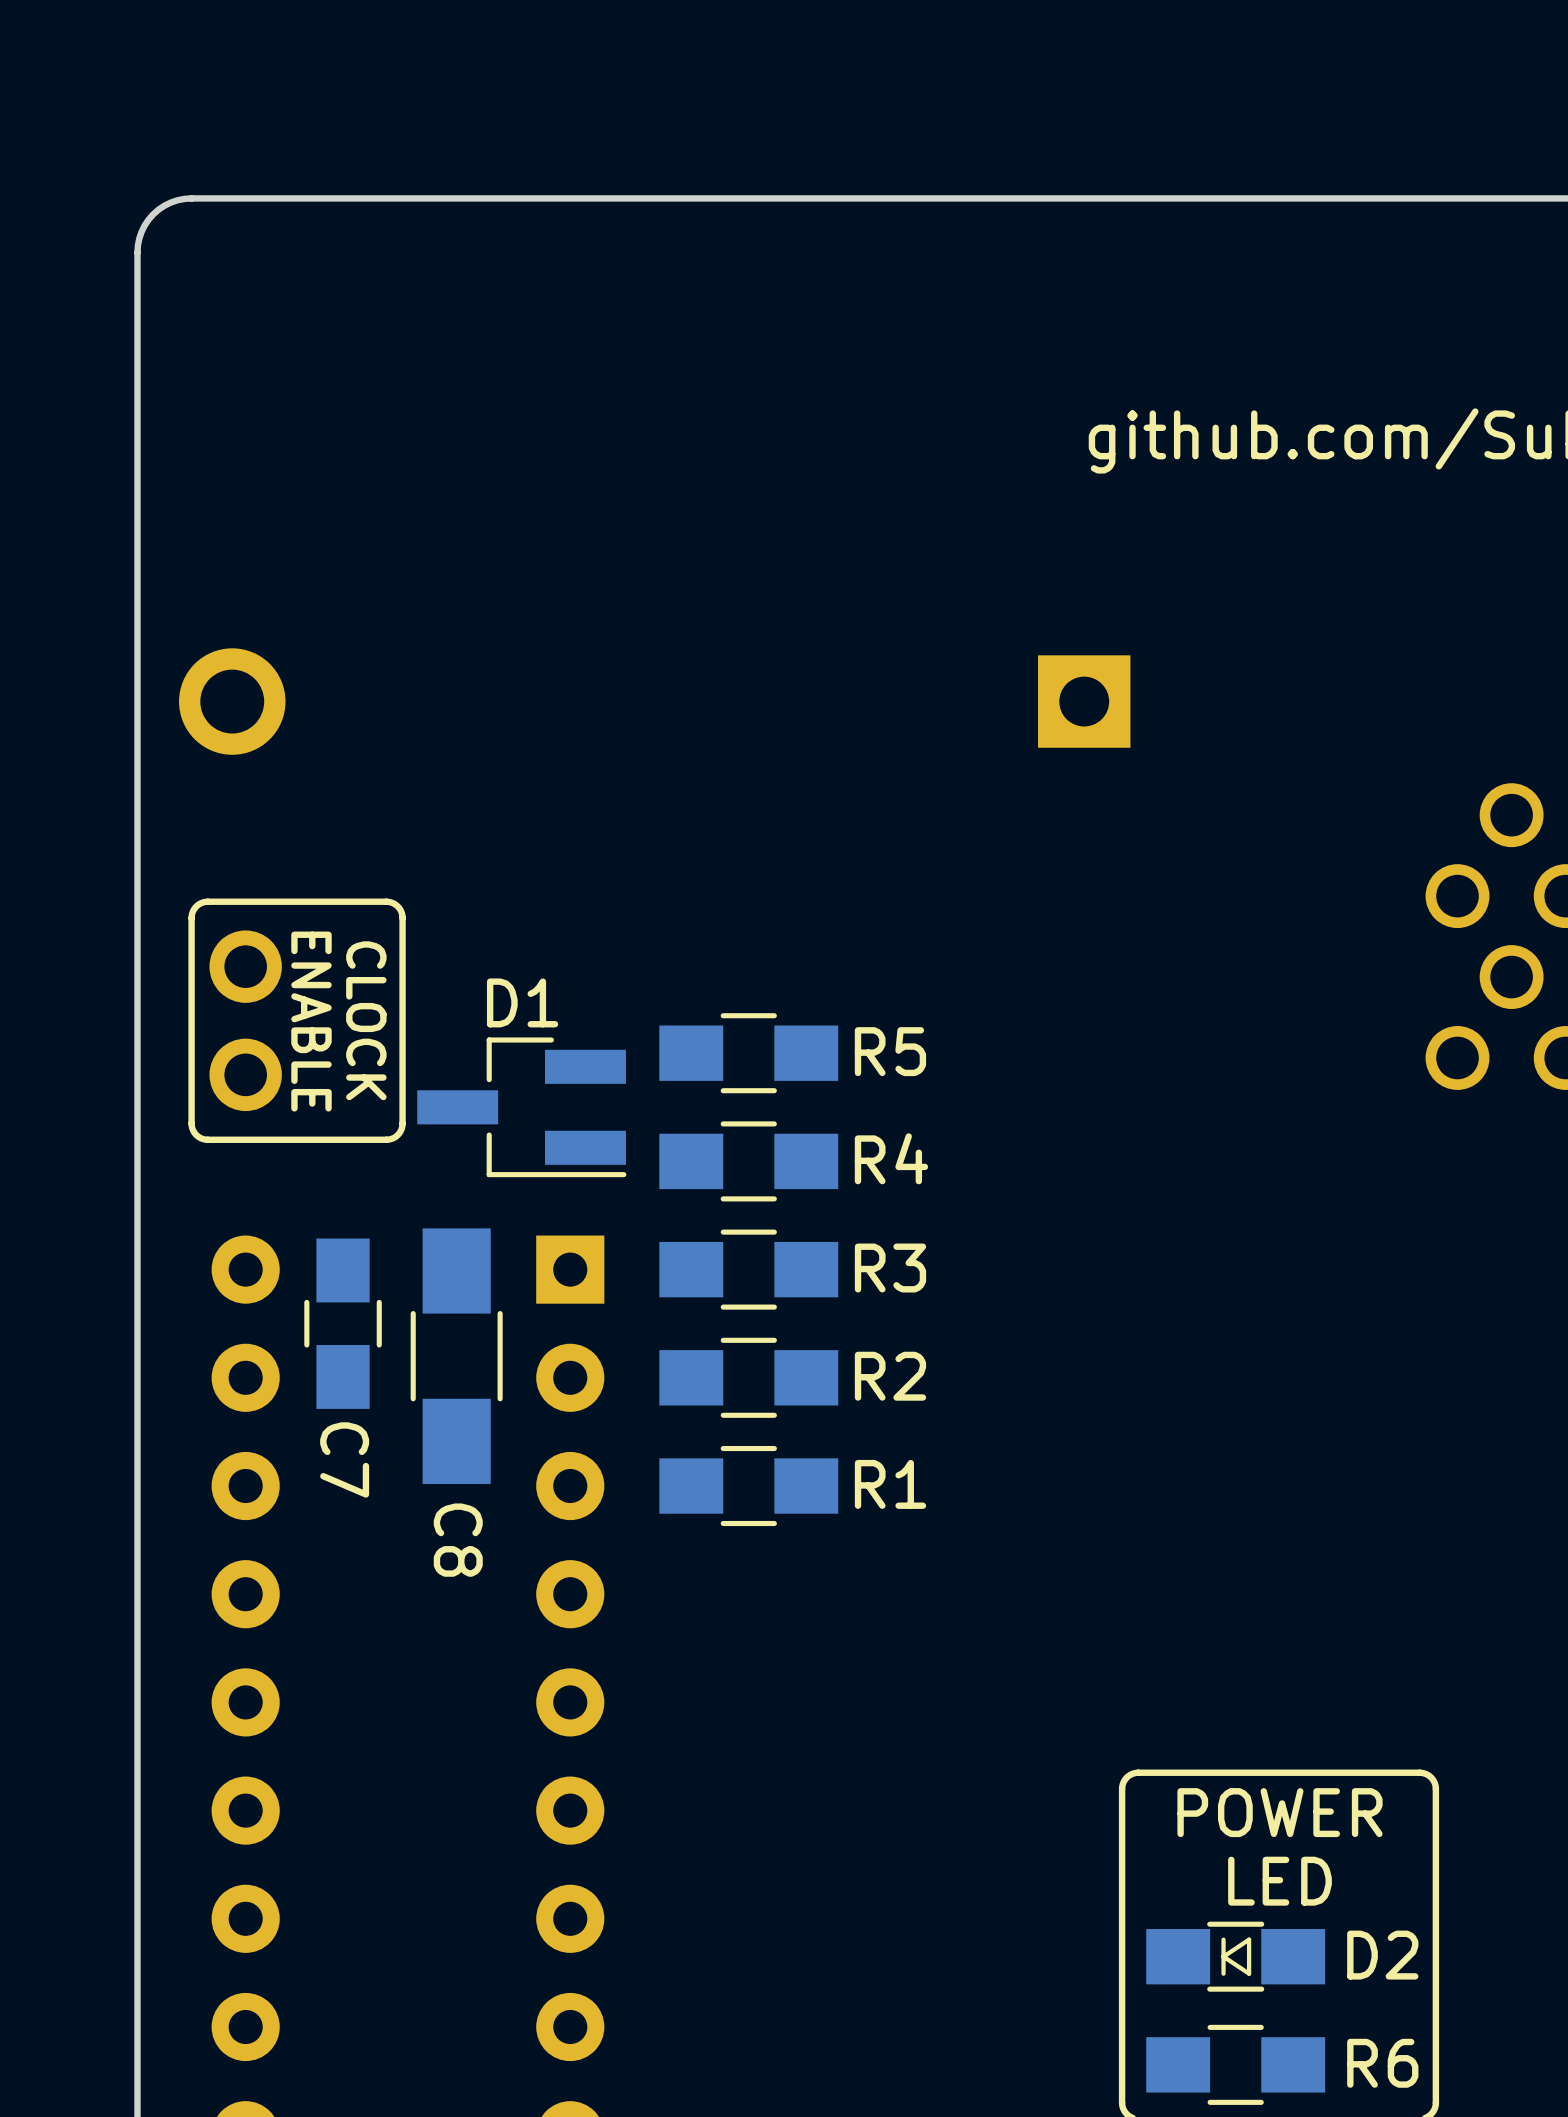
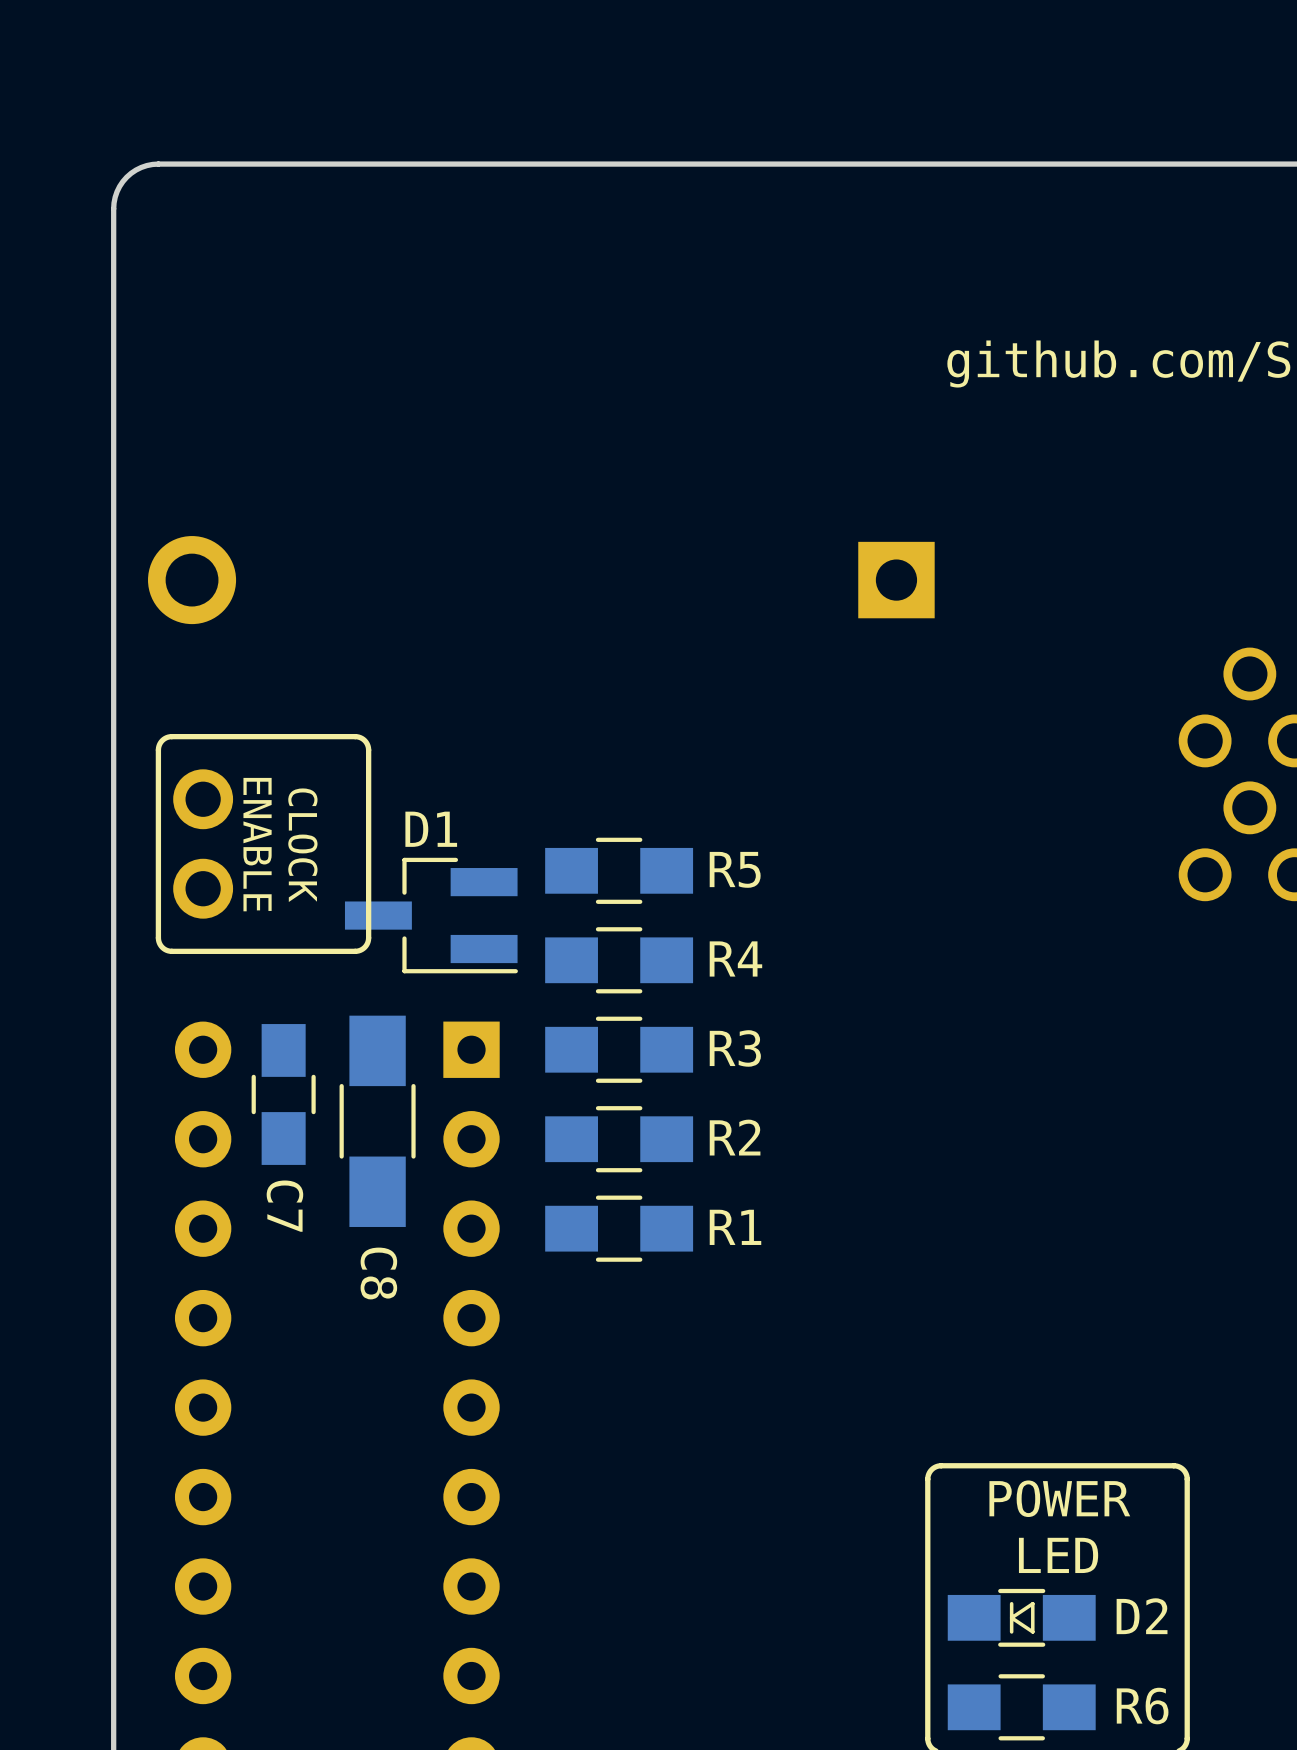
line: (191, 917) (196, 906) (207, 901) (388, 901) (399, 908) (402, 917) (402, 1123) (397, 1135) (386, 1139) (207, 1139) (196, 1135) (191, 1123) -> (158, 759) (160, 743) (170, 736) (355, 736) (363, 739) (368, 750) (368, 937) (365, 946) (356, 951) (171, 951) (165, 949) (160, 944) (158, 928)

